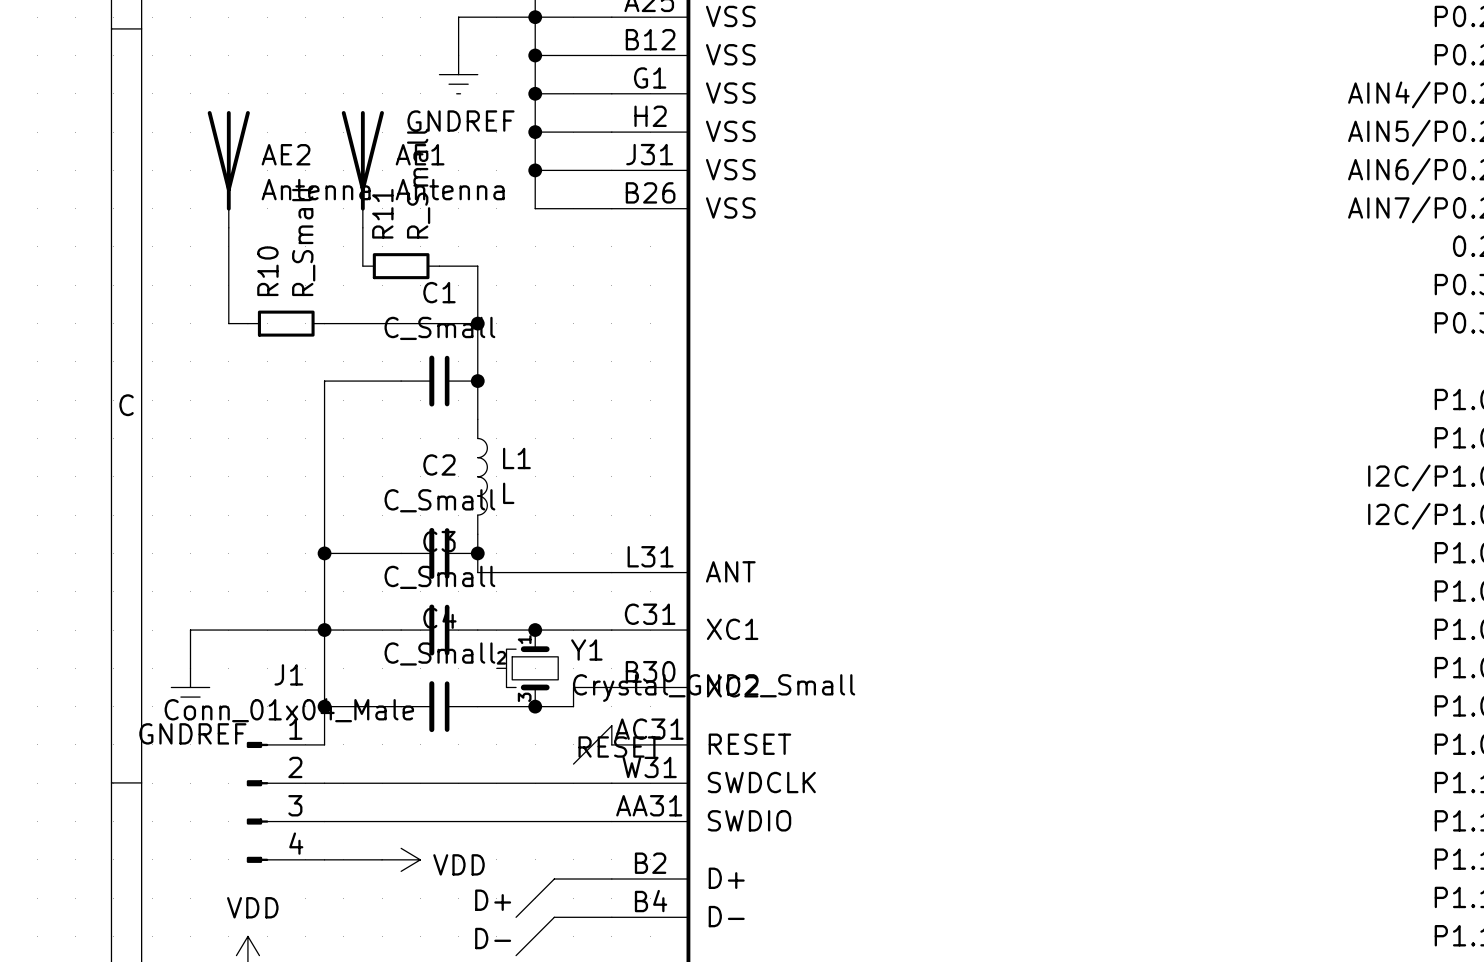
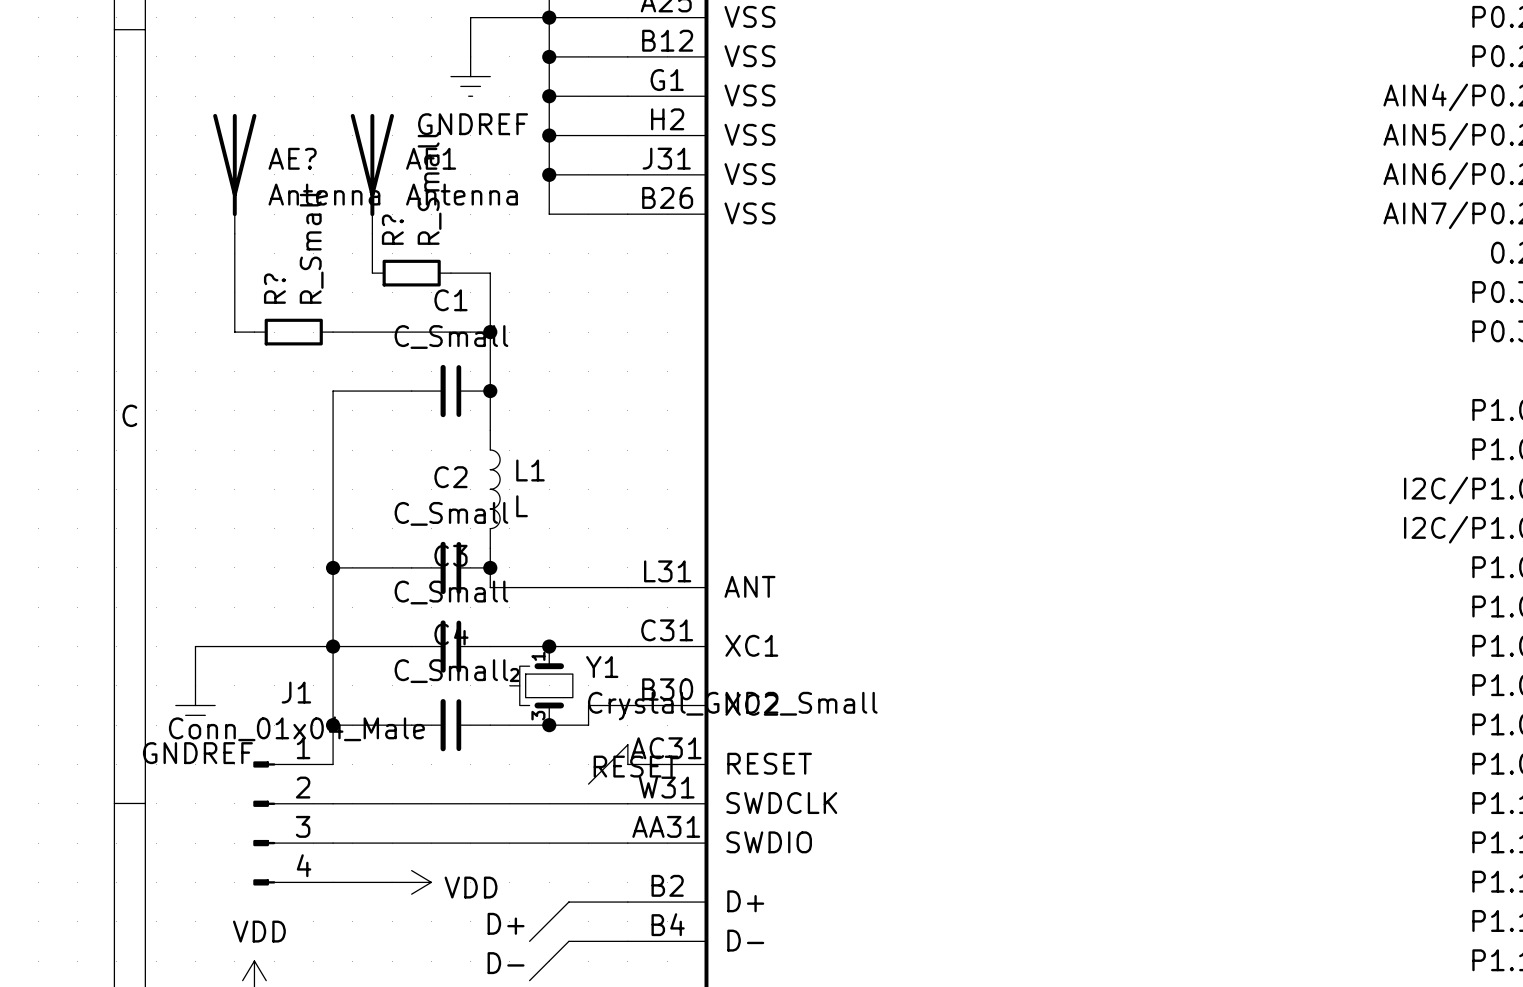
AE2 name: AE2 (286, 154) -> AE? (292, 158)
R11 name: R11 (382, 213) -> R? (392, 229)
R10 name: R10 (267, 271) -> R? (274, 288)

